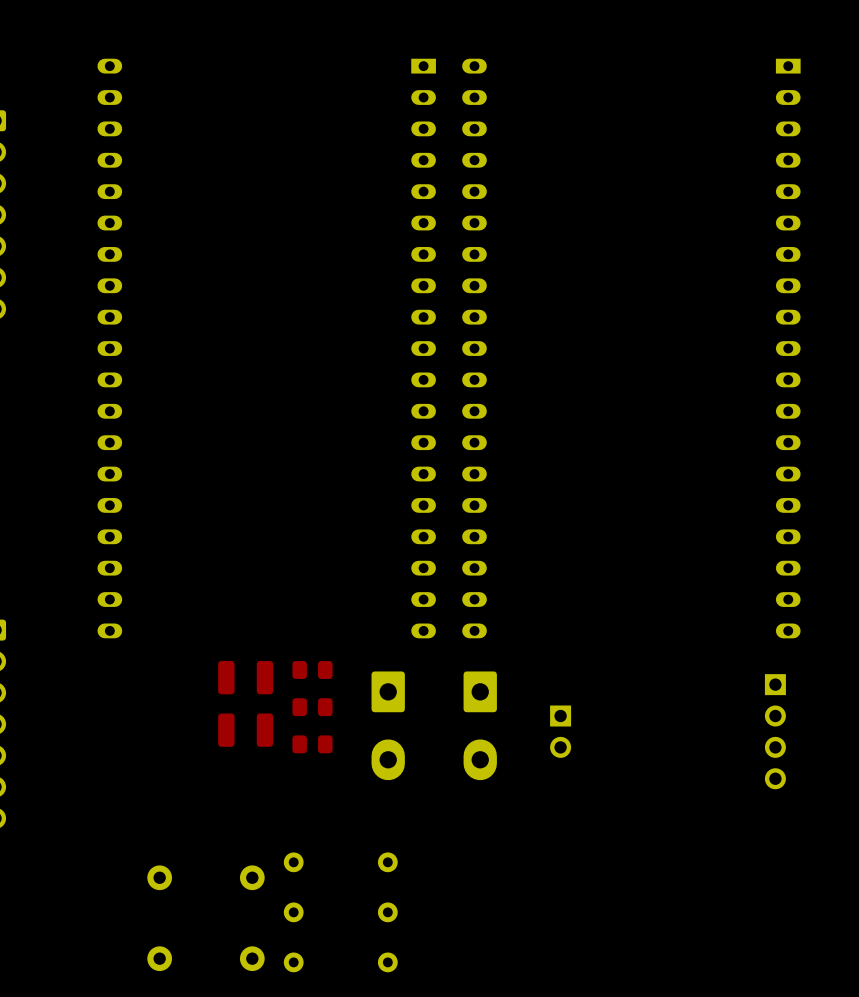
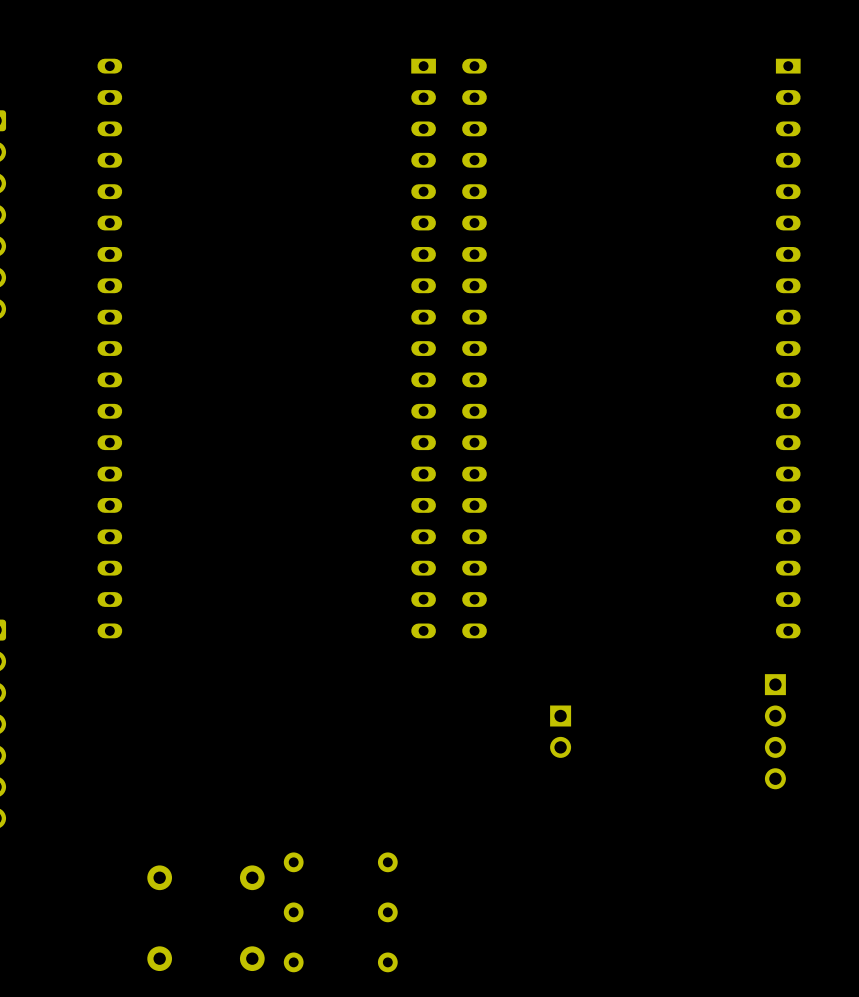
part: (312, 669) -> none
part: (245, 677) -> none
part: (312, 707) -> none
part: (388, 725) -> none
part: (480, 725) -> none
part: (245, 730) -> none
part: (312, 744) -> none

